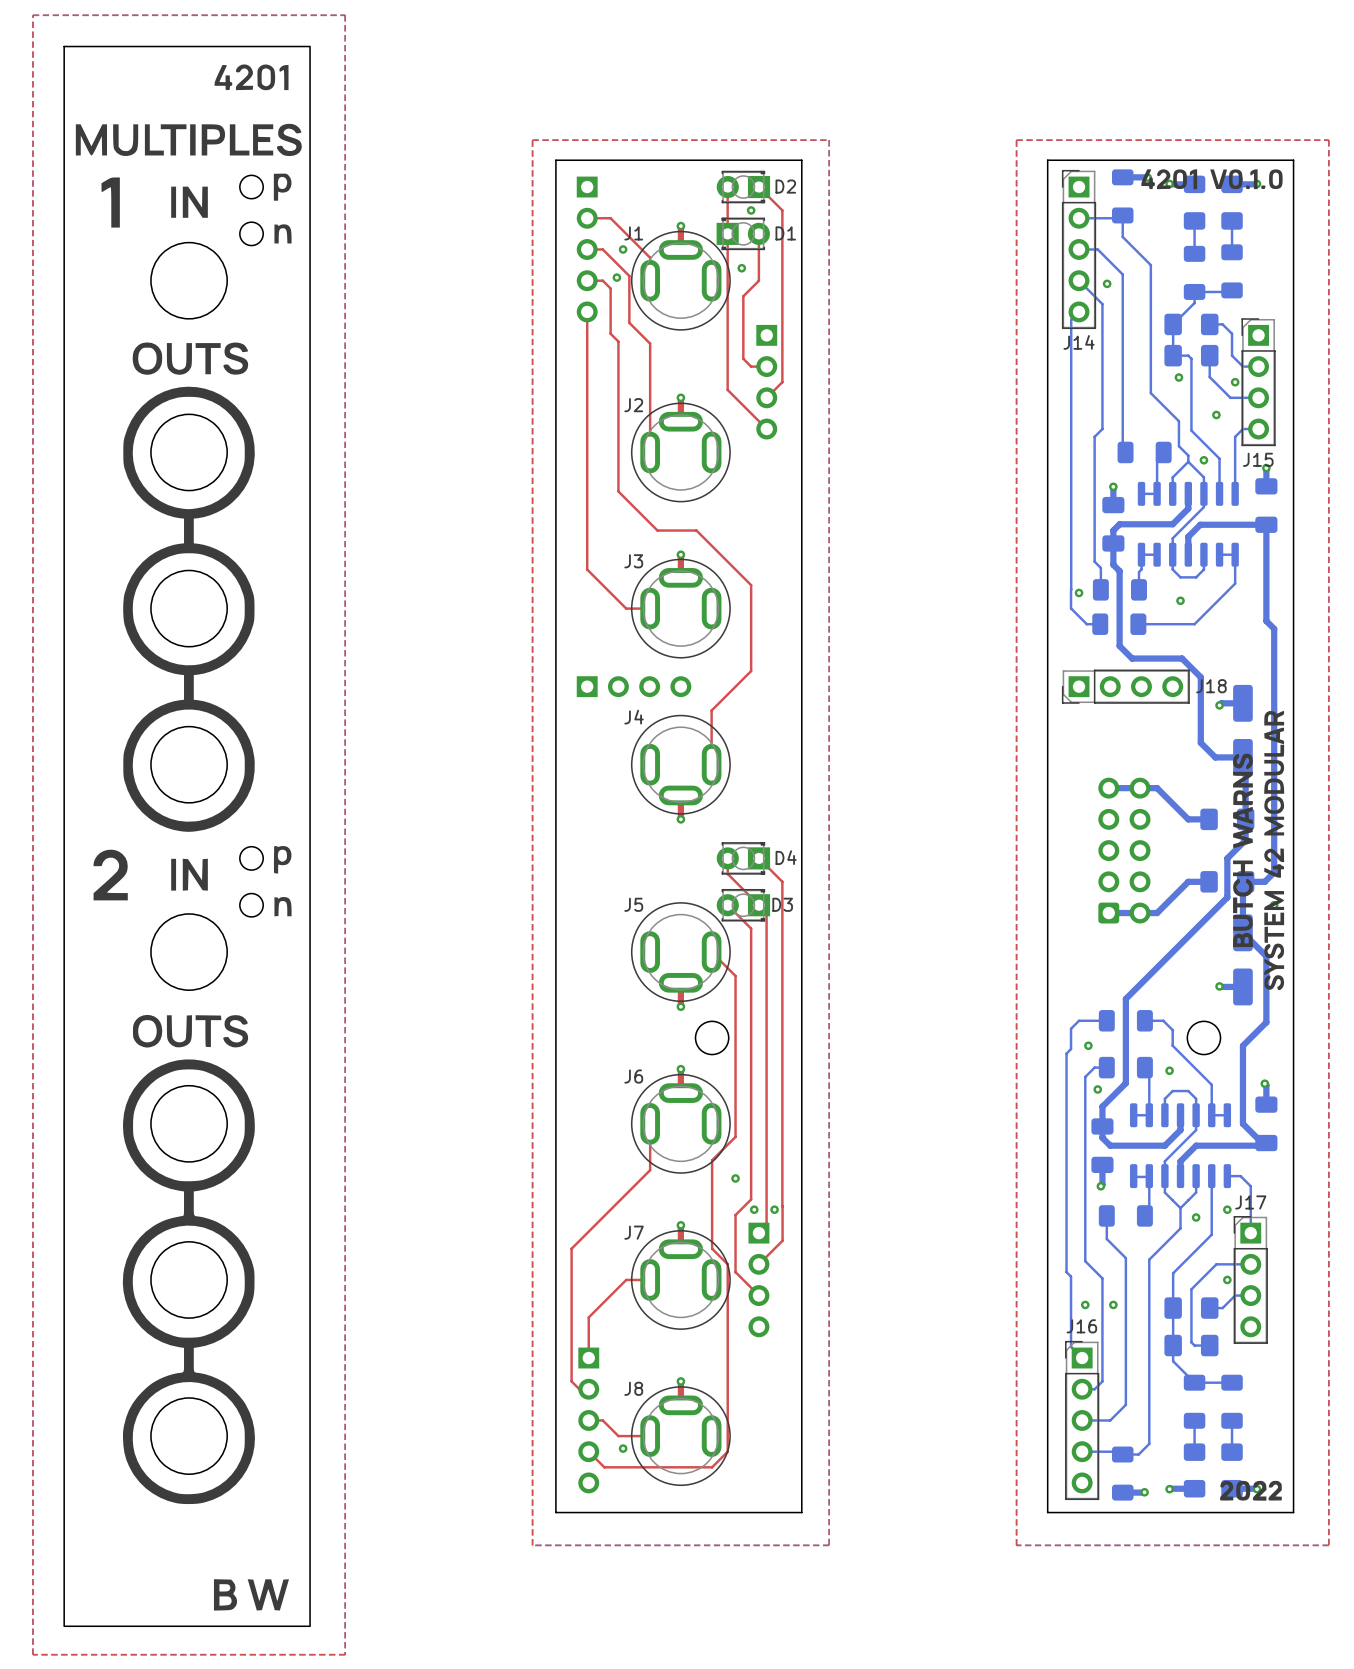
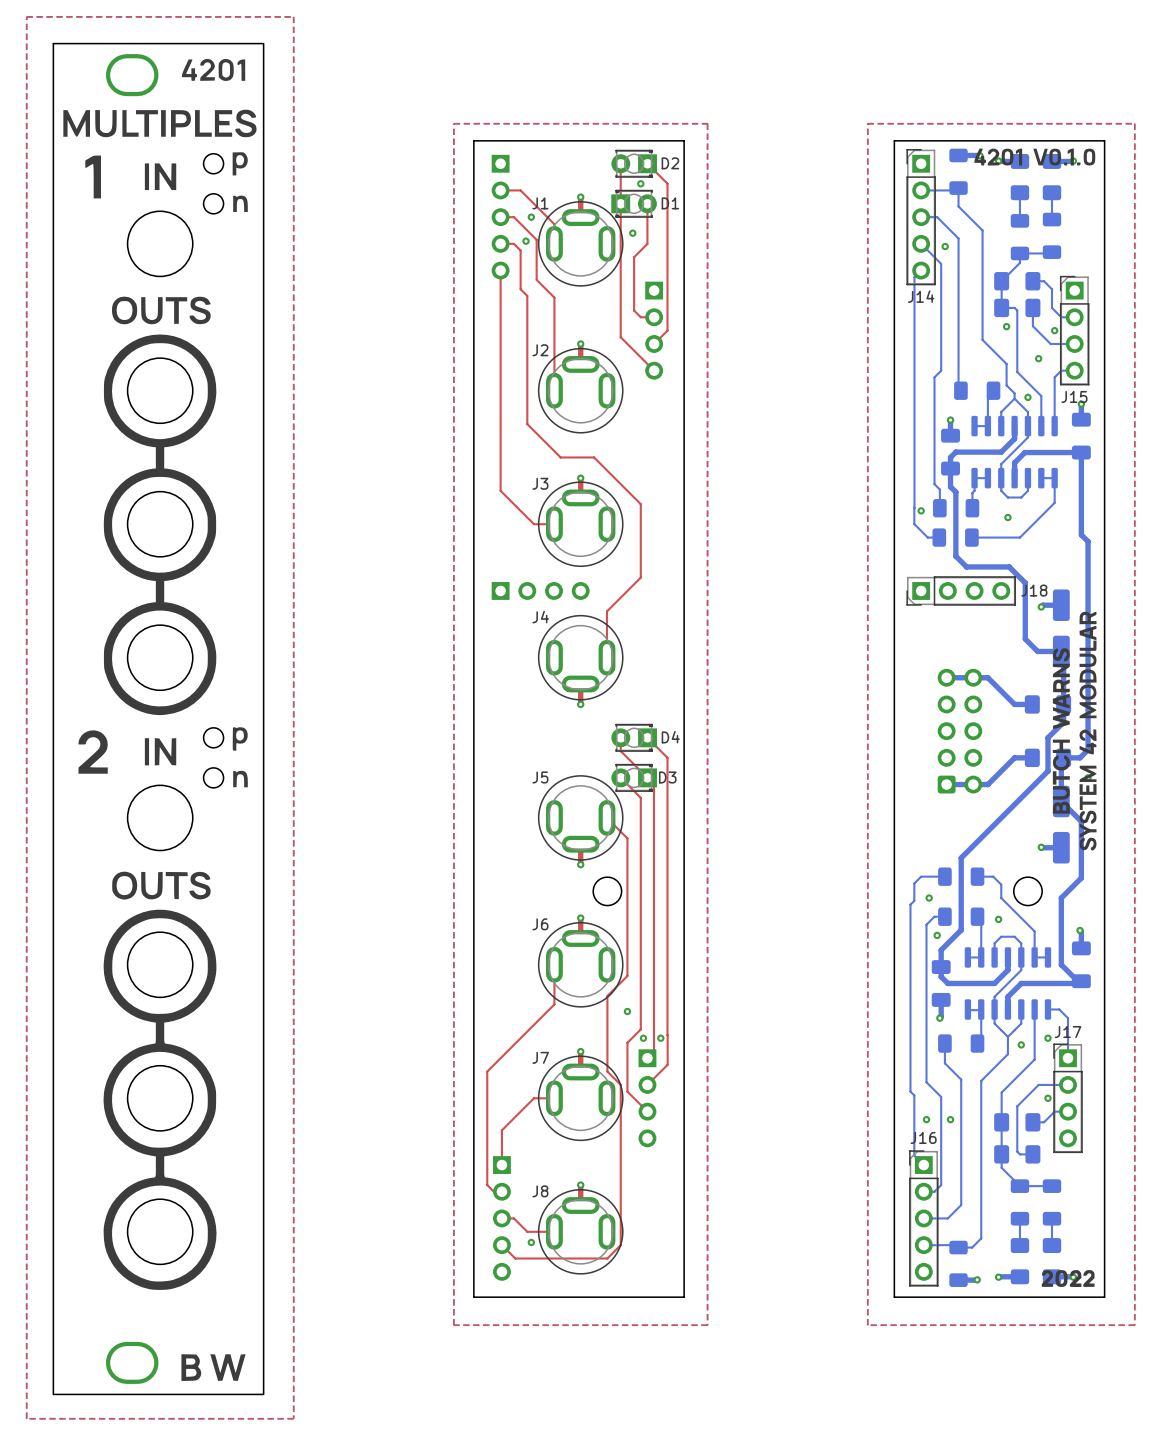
part footprint: [63, 45, 311, 1628] -> [52, 42, 265, 1396]

